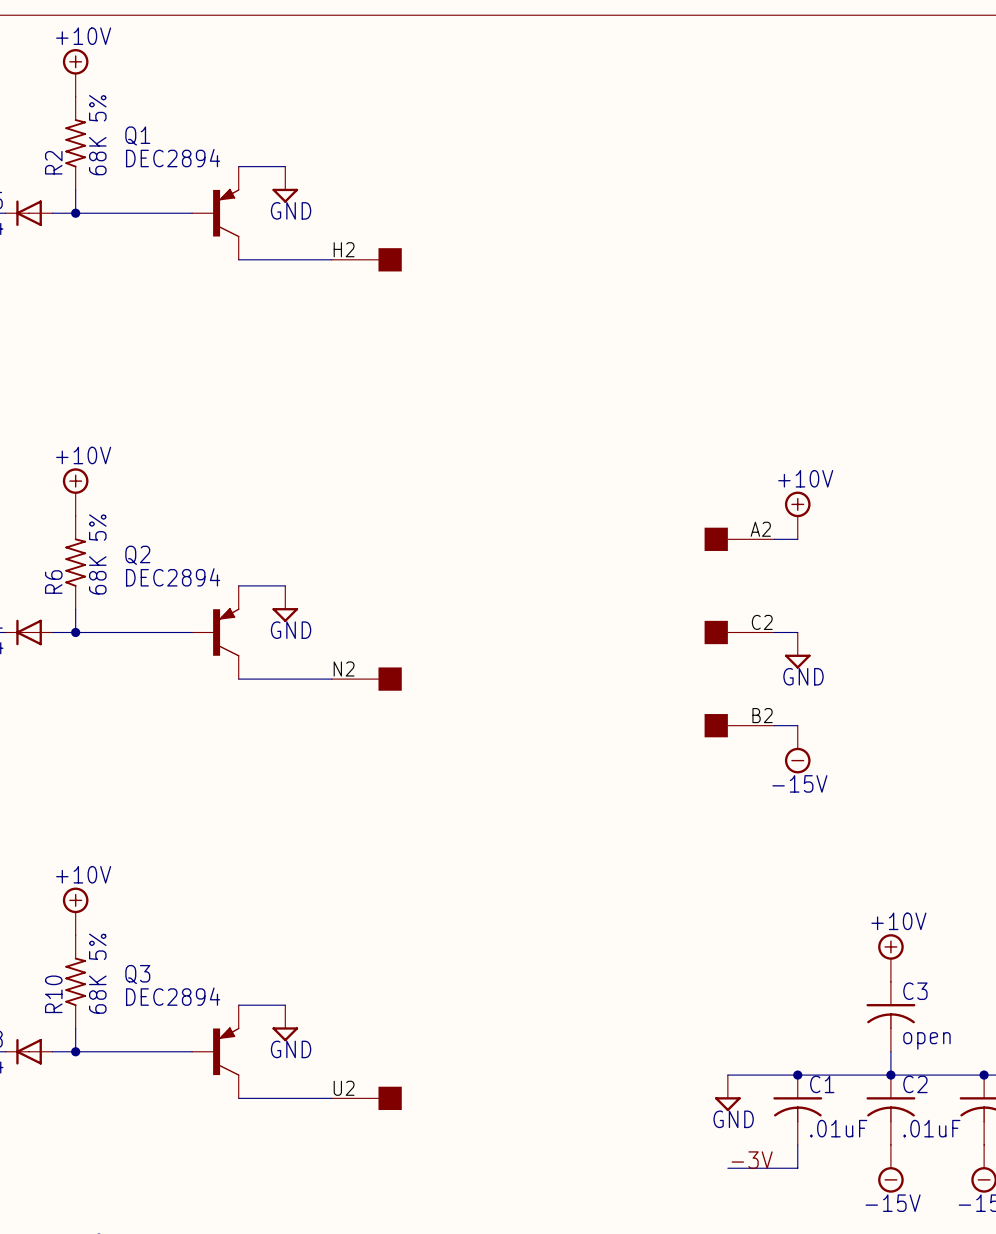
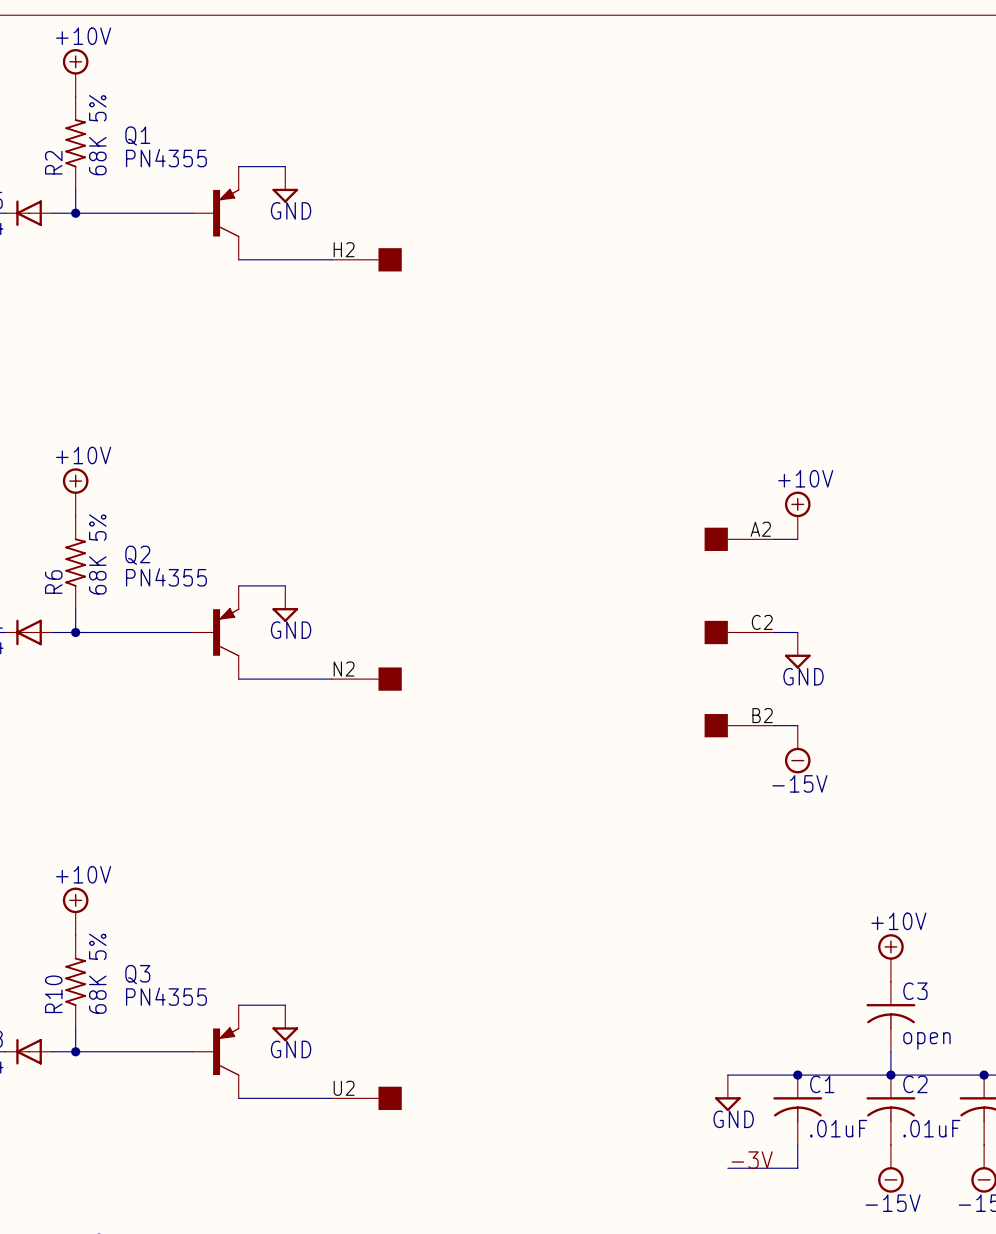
Q1 value: DEC2894 (173, 158) -> PN4355 (166, 158)
Q2 value: DEC2894 (173, 577) -> PN4355 (166, 577)
Q3 value: DEC2894 (173, 996) -> PN4355 (166, 996)

